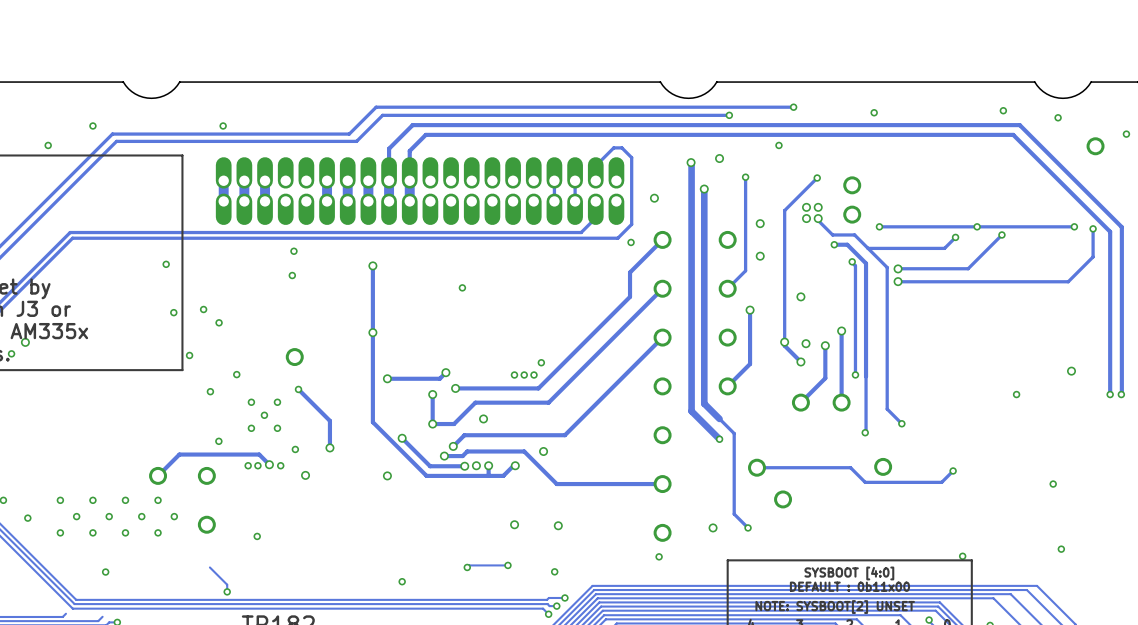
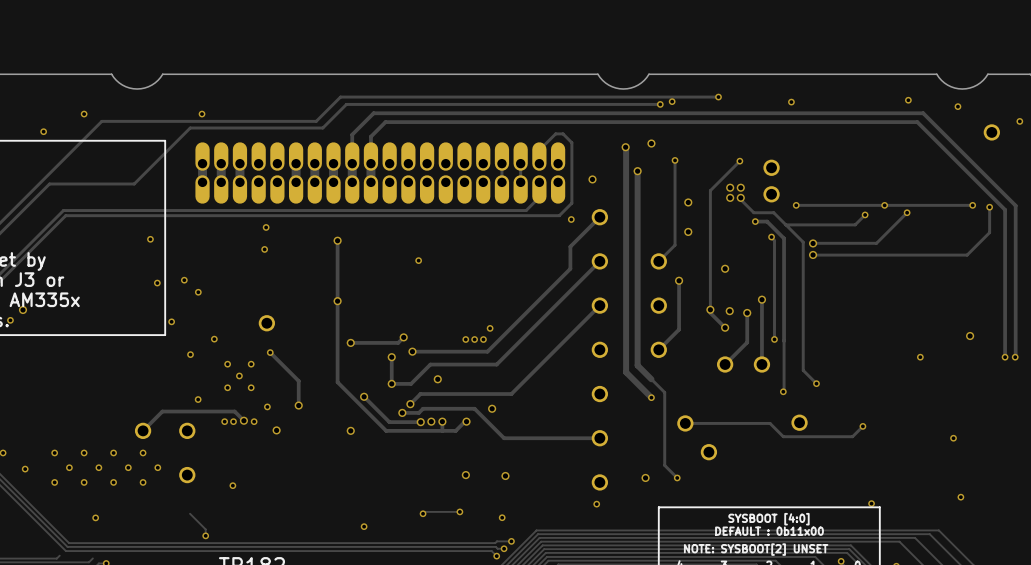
track: (210, 141) (116, 141) (54, 203) -> (190, 128) (134, 184) (49, 184)
via position: (778, 145) -> (672, 101)
part: (727, 239) -> none

